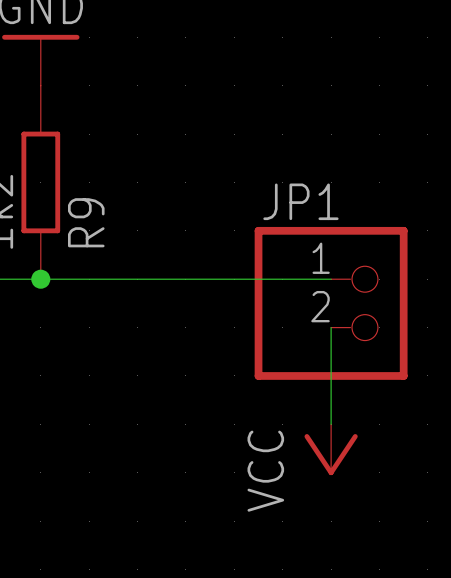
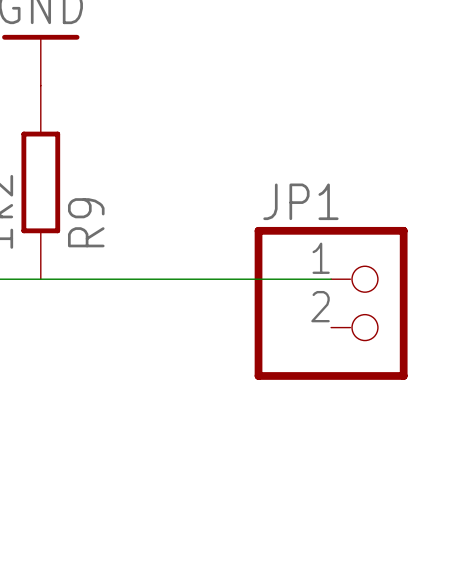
junction: (40, 279) -> none
wire: (331, 327) (331, 424) -> none
power symbol: VCC (331, 449) -> none

